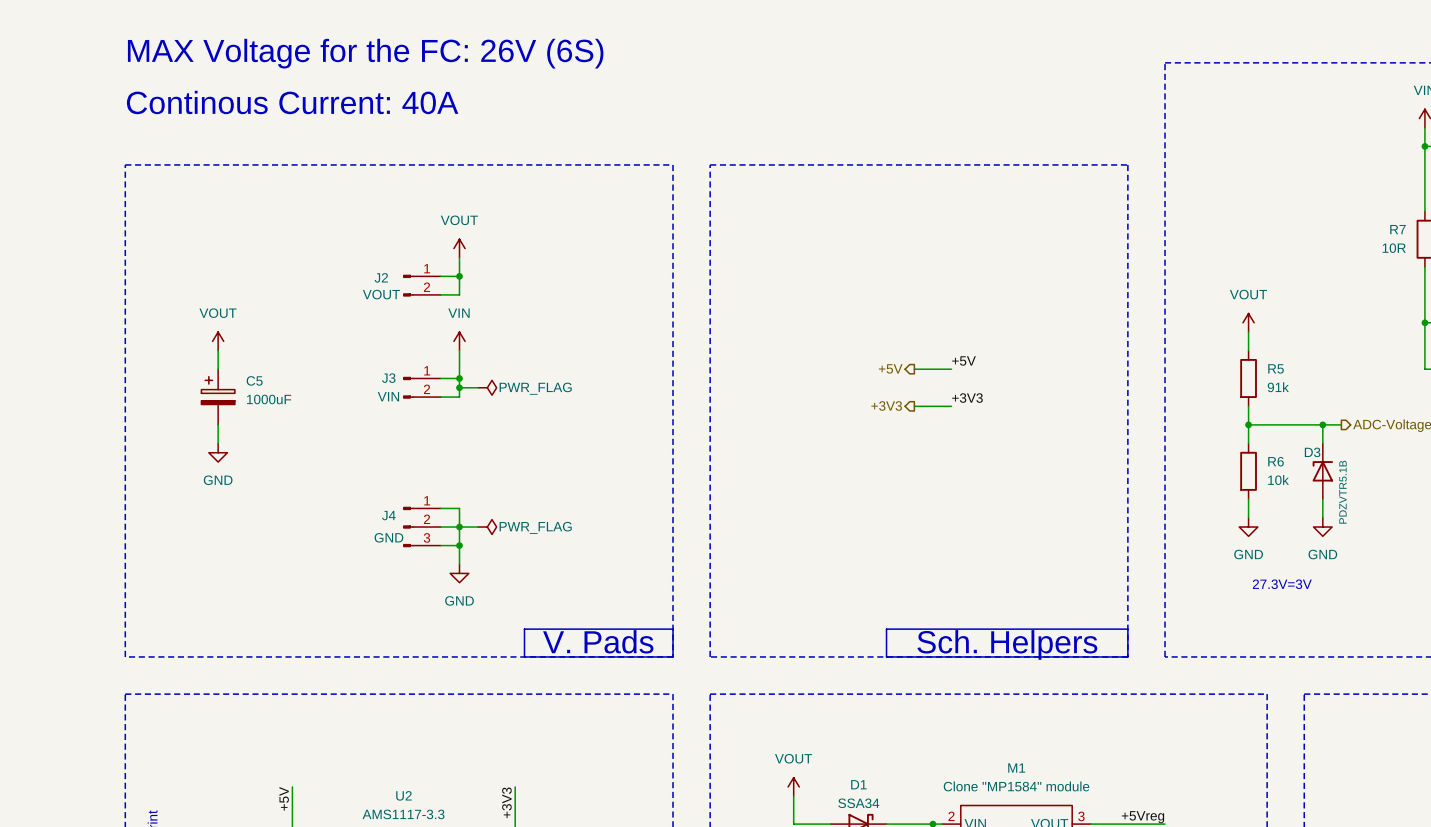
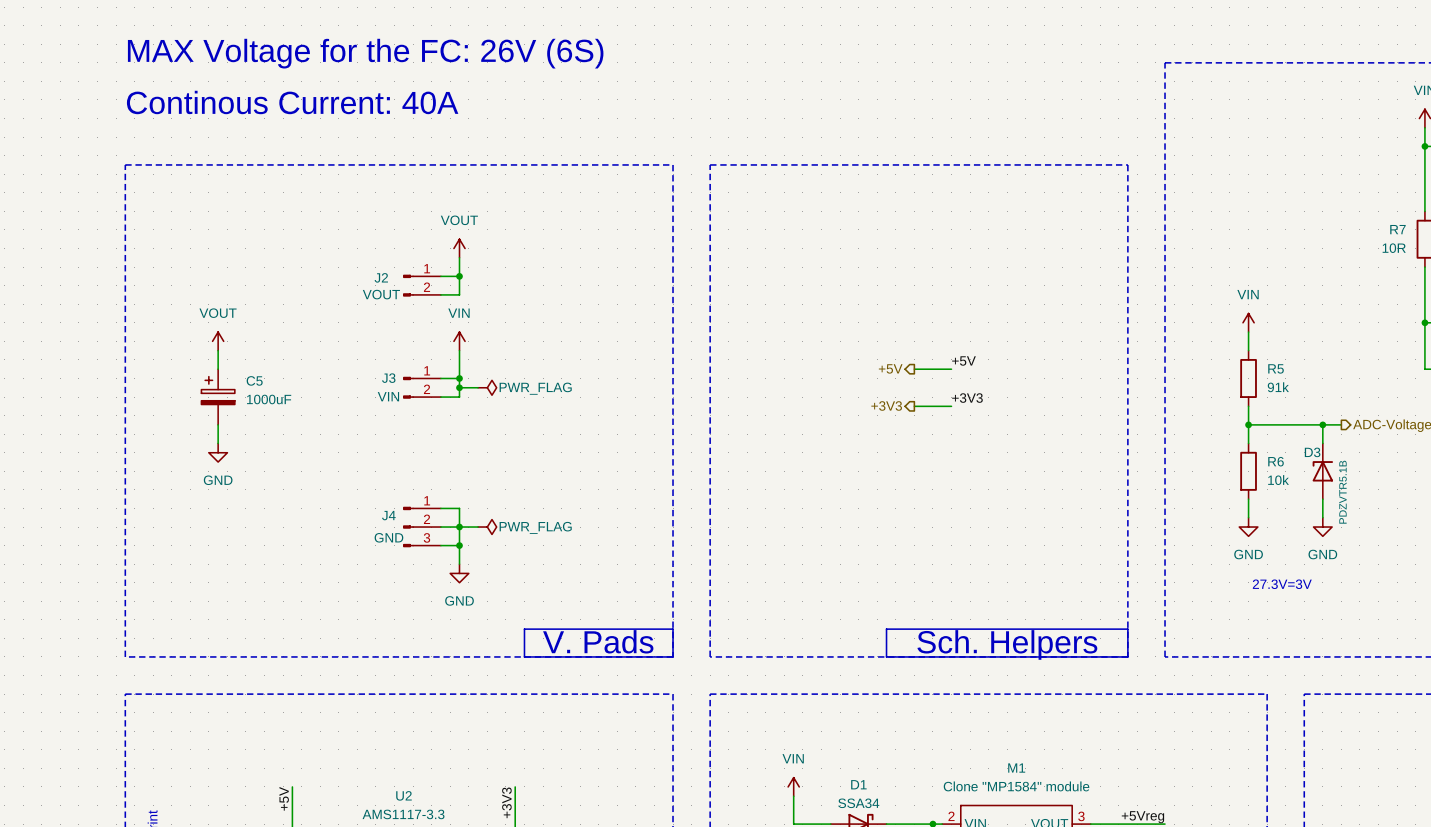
power symbol: VOUT (1248, 322) -> VIN (1248, 322)
power symbol: VOUT (793, 786) -> VIN (793, 786)

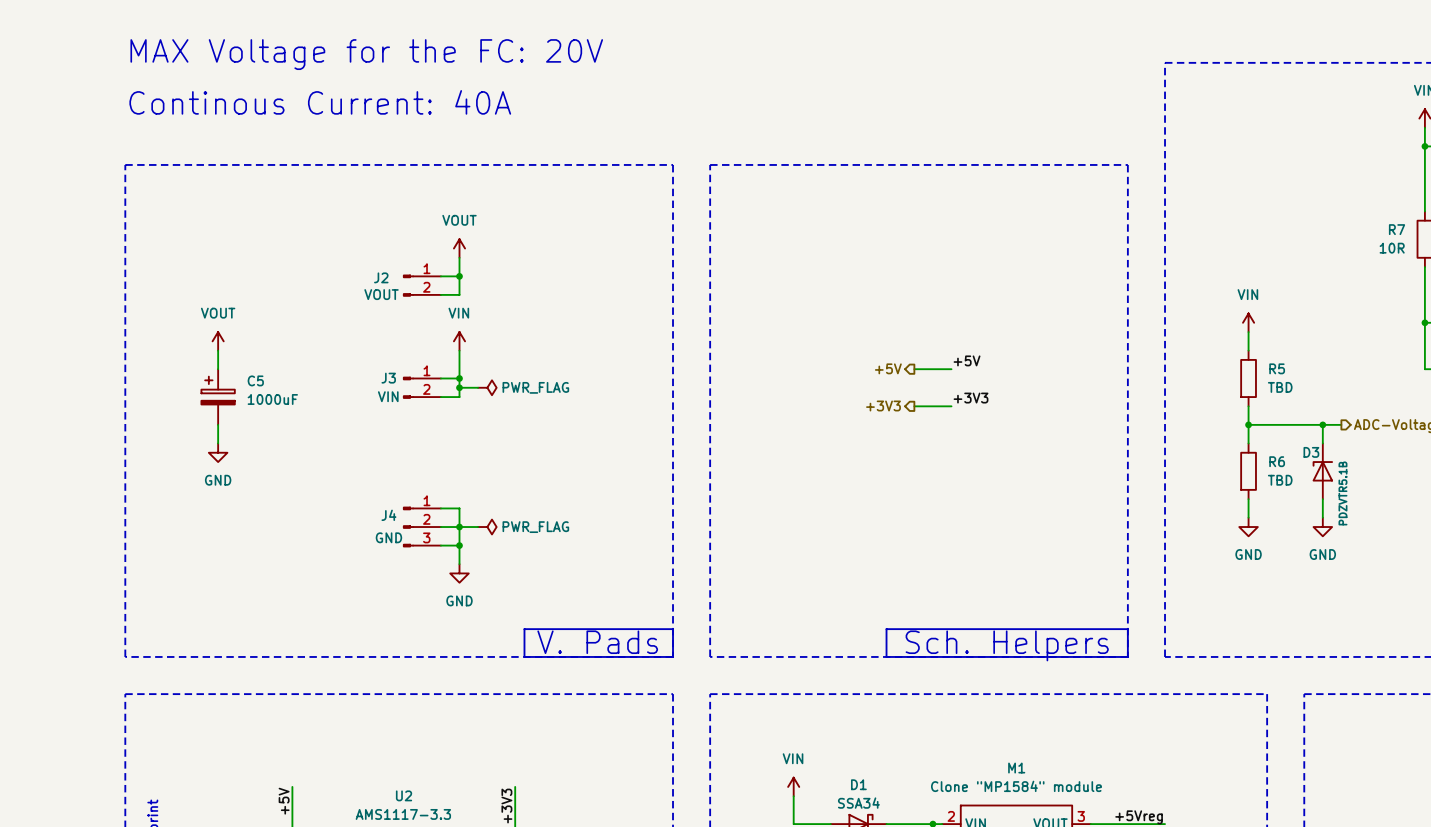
text: MAX Voltage for the FC: 26V (6S) (365, 53) -> MAX Voltage for the FC: 20V (366, 54)
R5 value: 91k (1278, 387) -> TBD (1280, 387)
R6 value: 10k (1278, 480) -> TBD (1280, 480)
text: 27.3V=3V (1282, 584) -> none

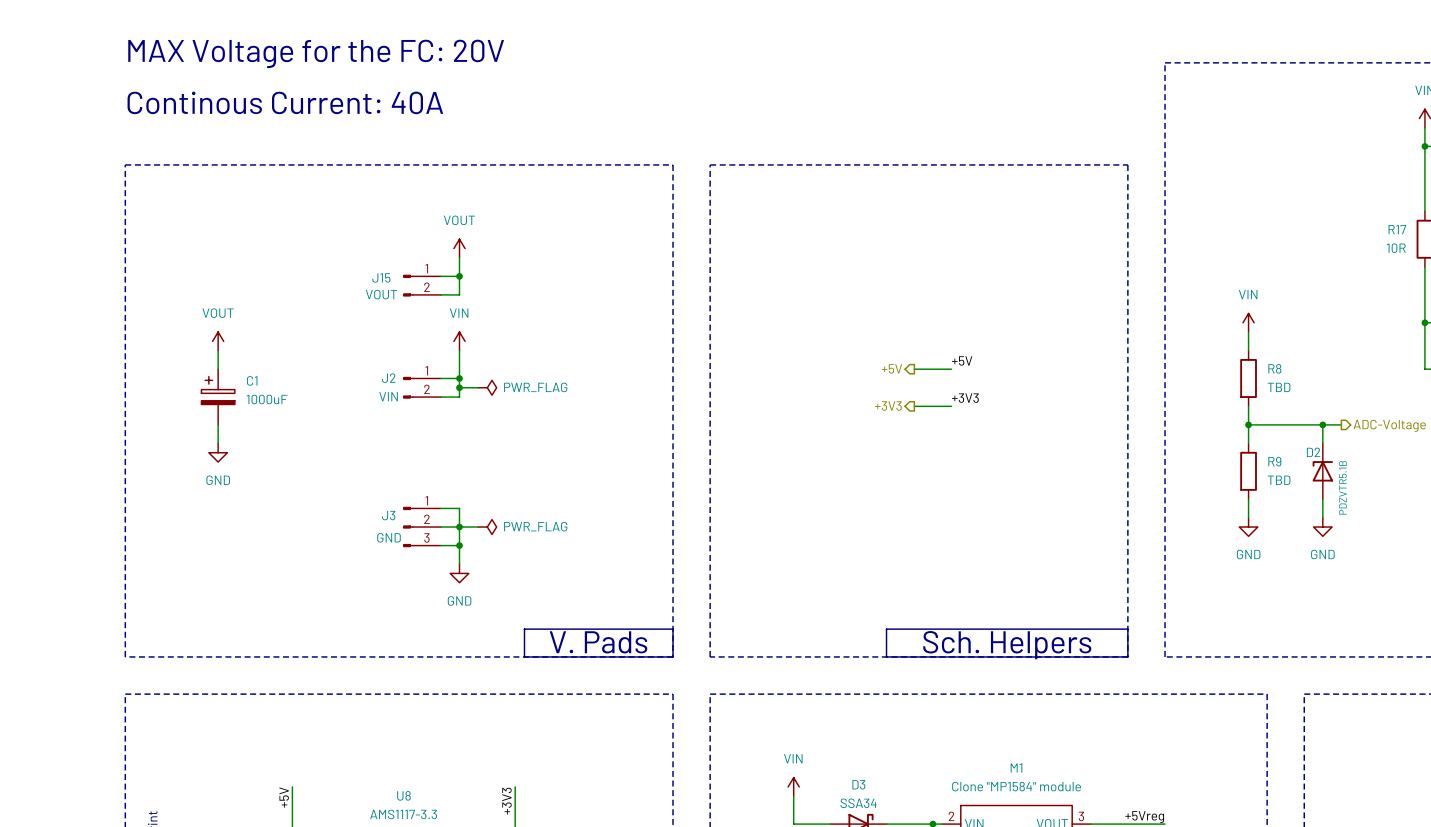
R7 name: R7 (1397, 229) -> R17 (1397, 229)
J2 name: J2 (381, 277) -> J15 (381, 277)
R5 name: R5 (1277, 368) -> R8 (1274, 368)
J3 name: J3 (388, 378) -> J2 (388, 378)
C5 name: C5 (255, 380) -> C1 (252, 380)
D3 name: D3 (1311, 452) -> D2 (1313, 452)
R6 name: R6 (1277, 461) -> R9 (1274, 461)
J4 name: J4 (388, 515) -> J3 (388, 515)
D1 name: D1 (858, 784) -> D3 (858, 784)
U2 name: U2 (404, 795) -> U8 (403, 795)

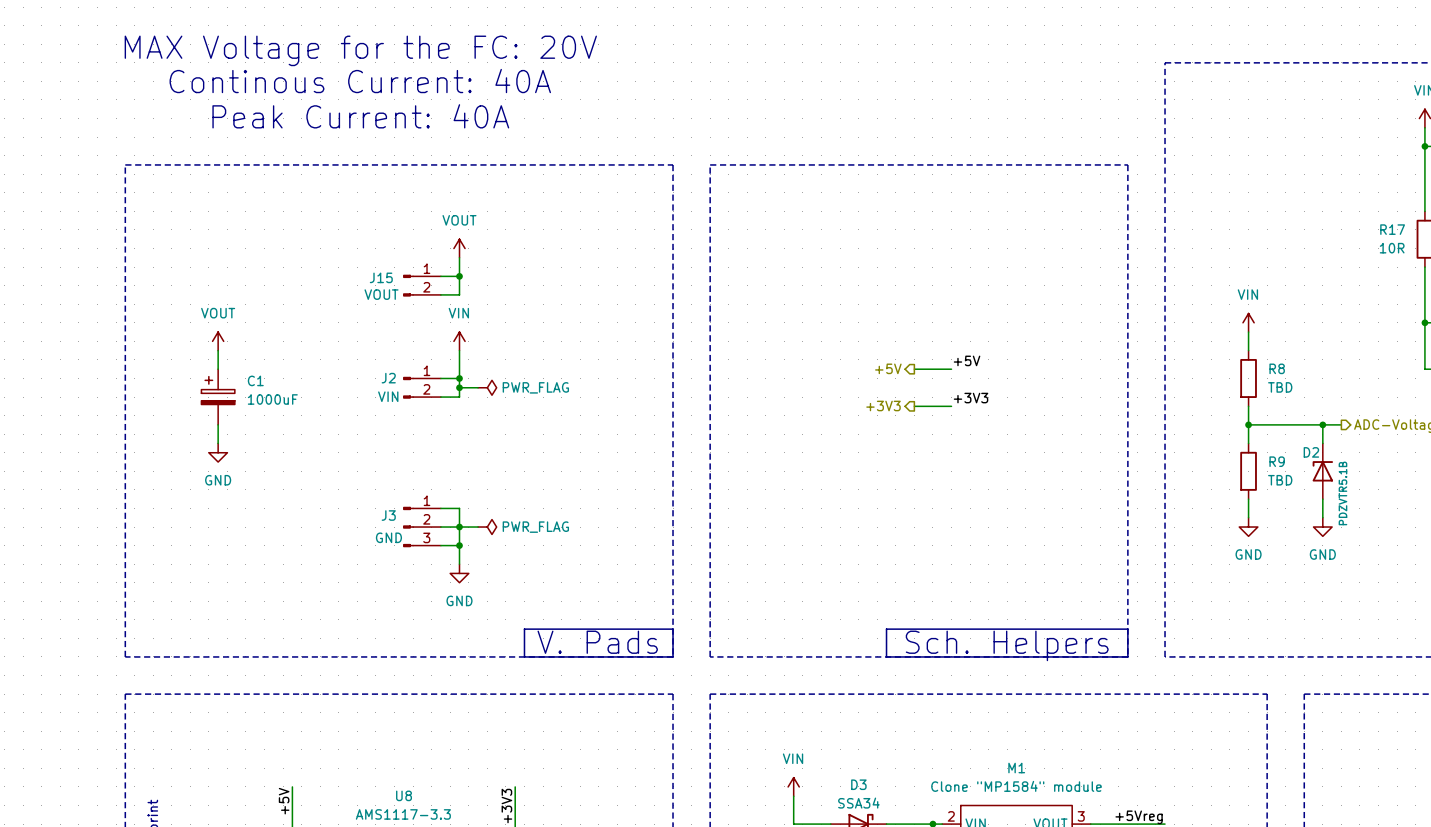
text: none -> MAX Voltage for the FC: 20V (360, 50)
text: MAX Voltage for the FC: 20V (316, 53) -> none
text: none -> Continous Current: 40A (360, 81)
text: Continous Current: 40A (285, 102) -> none
text: none -> Peak Current: 40A (360, 116)

